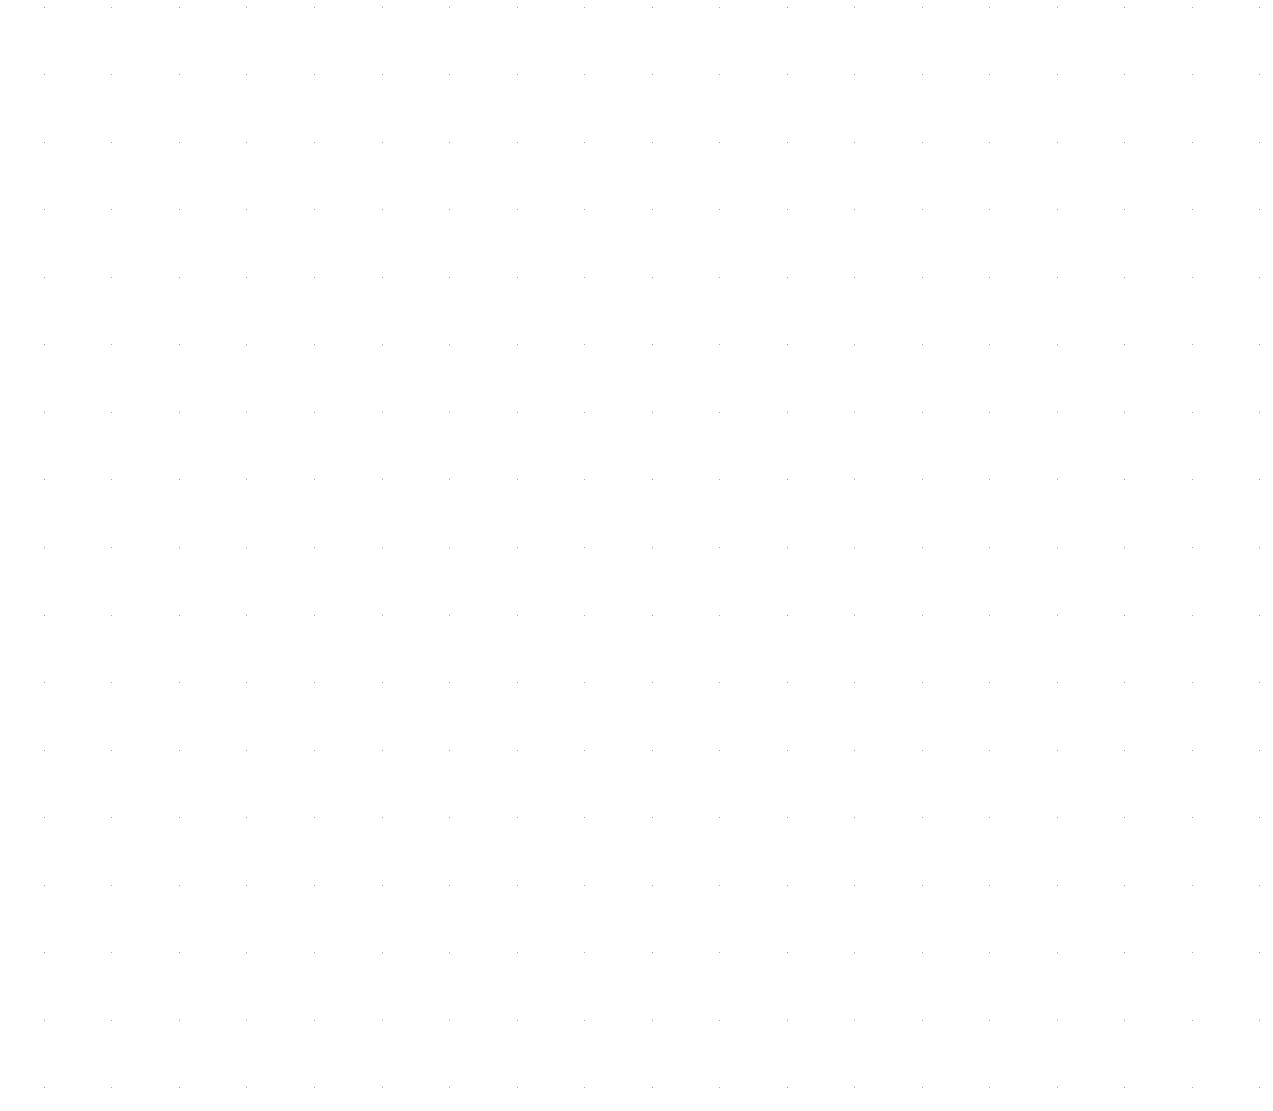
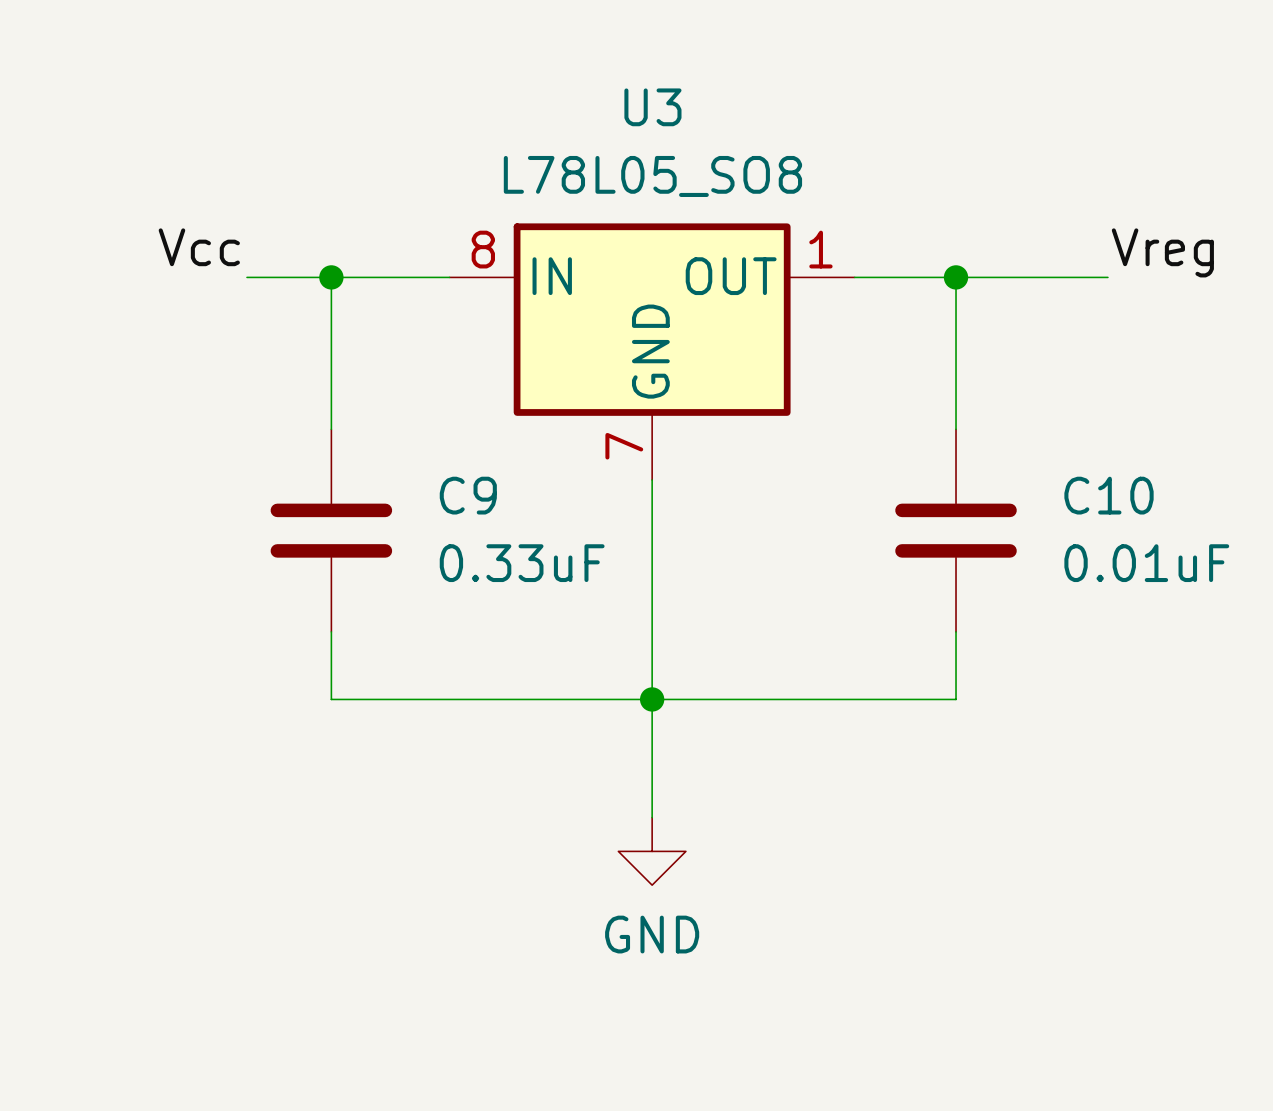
label: none -> Vcc (199, 247)
label: none -> Vreg (1162, 252)
wire: none -> (246, 277) (449, 277)
wire: none -> (331, 277) (331, 429)
junction: none -> (331, 277)
wire: none -> (854, 277) (1107, 277)
wire: none -> (956, 277) (956, 429)
junction: none -> (956, 277)
U3: none -> L78L05_SO8 (652, 351)
wire: none -> (652, 479) (652, 817)
C9: none -> 0.33uF (331, 530)
C10: none -> 0.01uF (956, 530)
wire: none -> (331, 631) (331, 699) (956, 699) (956, 631)
junction: none -> (652, 699)
power symbol: none -> GND (652, 851)

